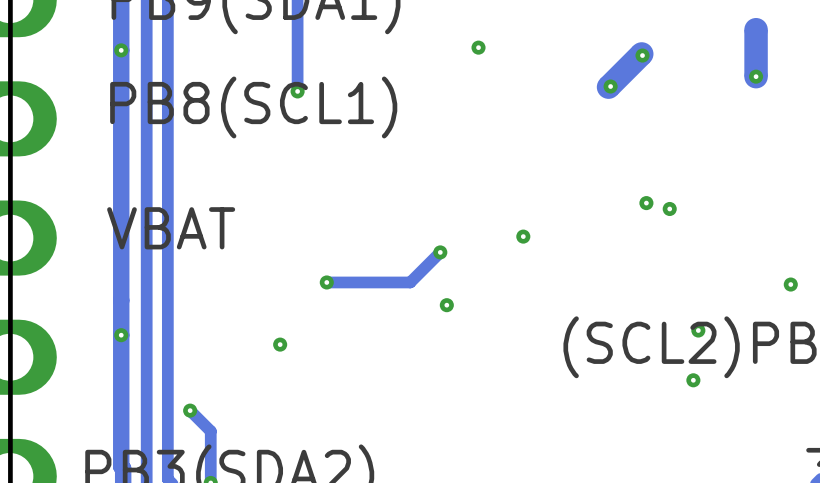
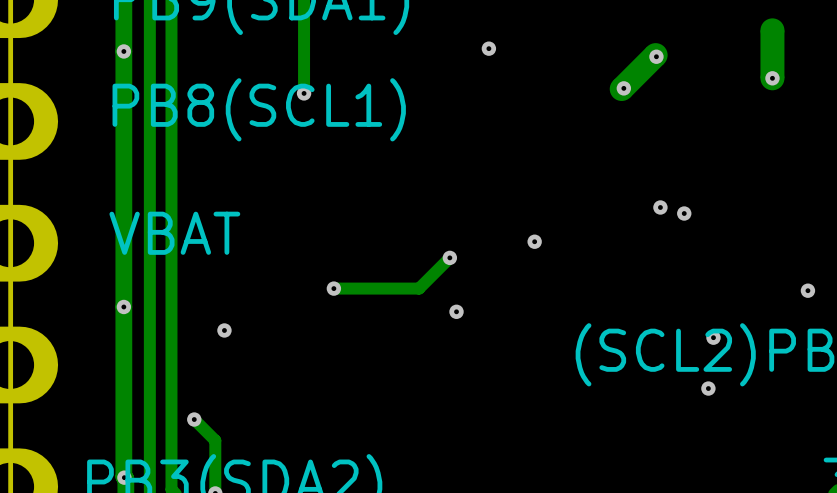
via: none -> (224, 330)
via position: (121, 335) -> (123, 306)
via: (280, 344) -> none
via: none -> (124, 477)

